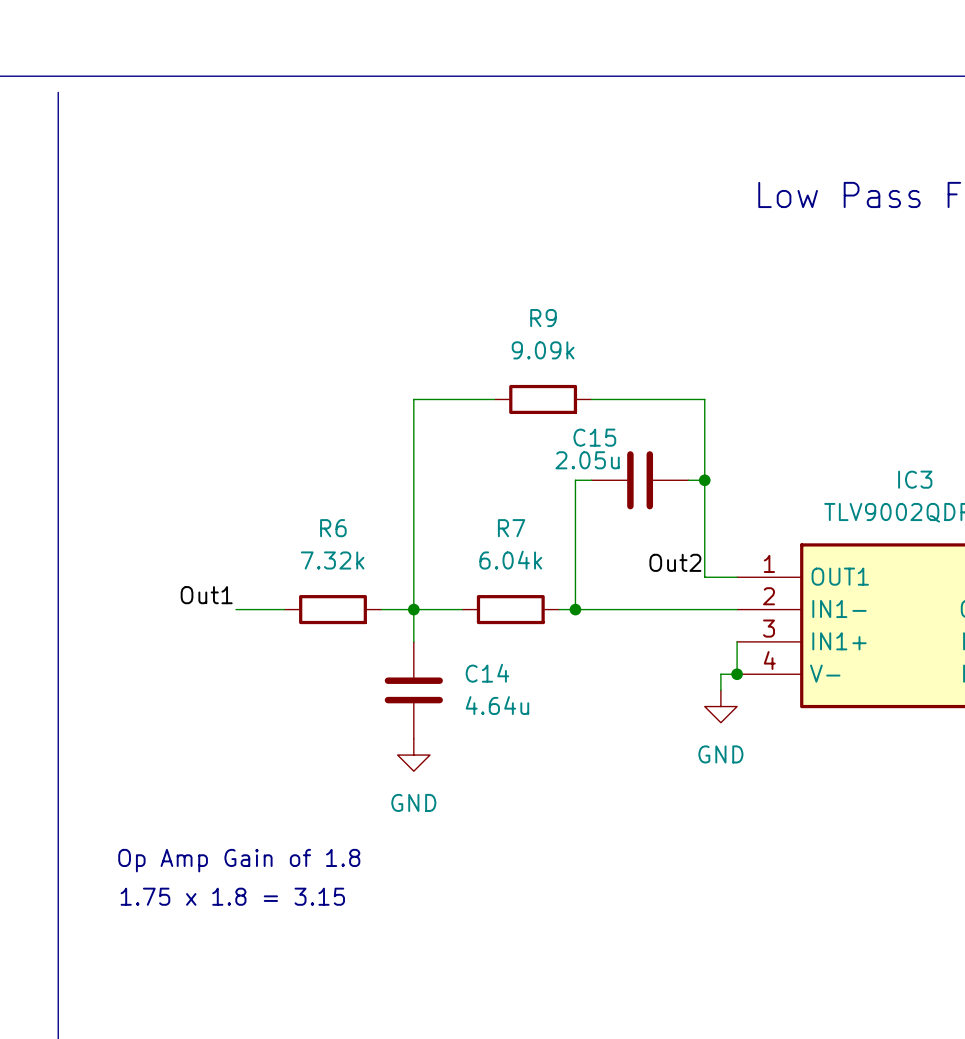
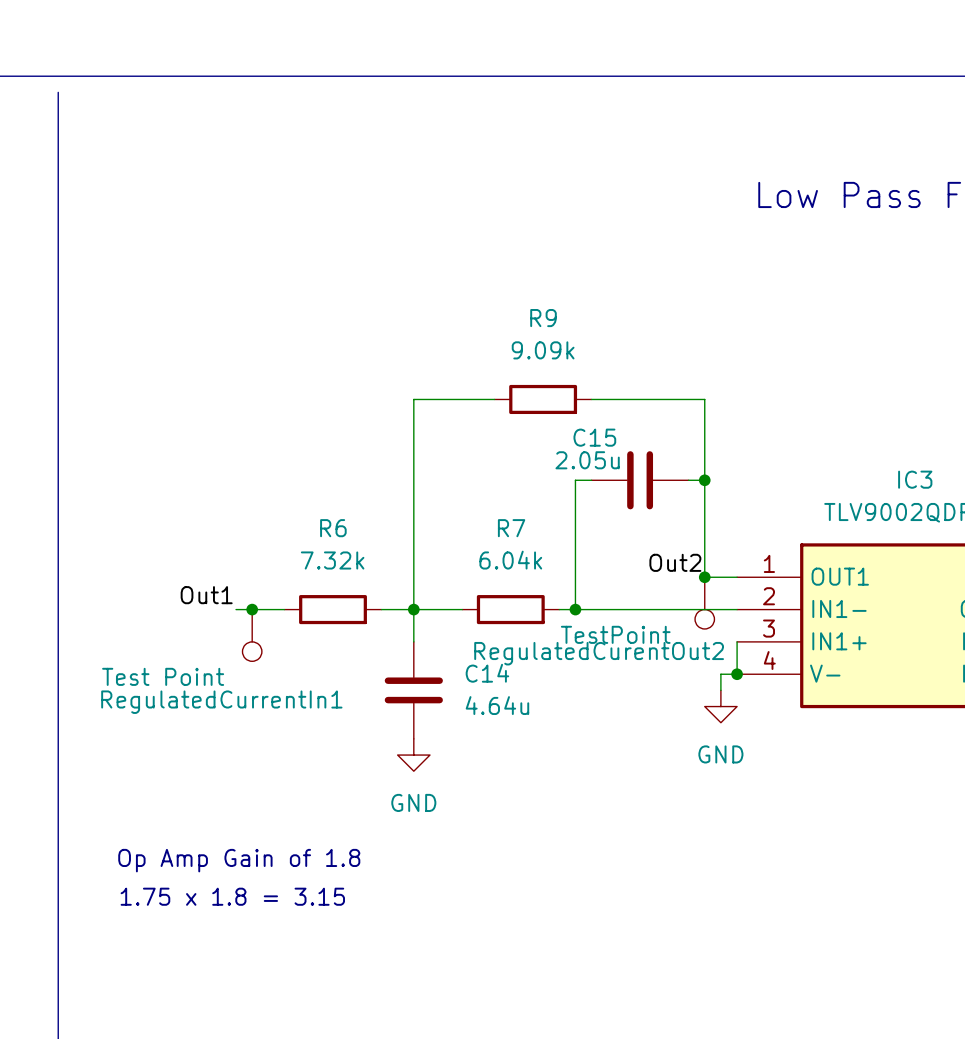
junction: none -> (704, 577)
RegulatedCurentOut2: none -> TestPoint (704, 603)
junction: none -> (252, 609)
RegulatedCurrentIn1: none -> Test Point (252, 635)

